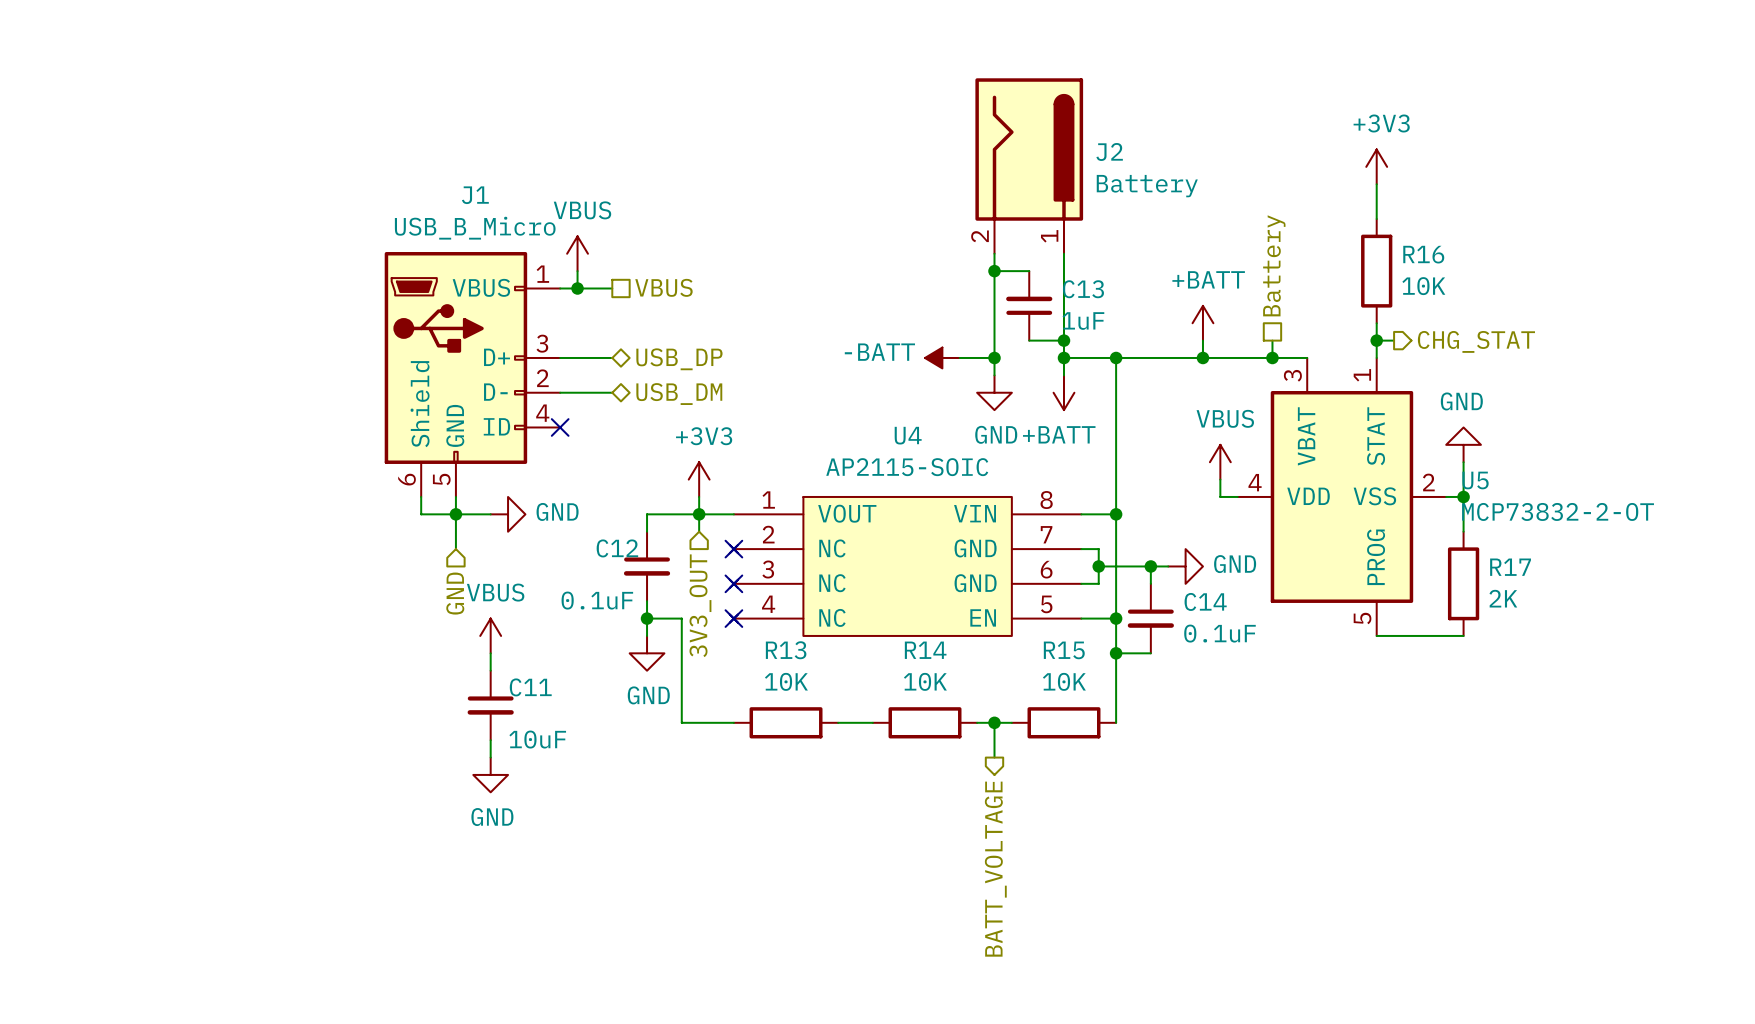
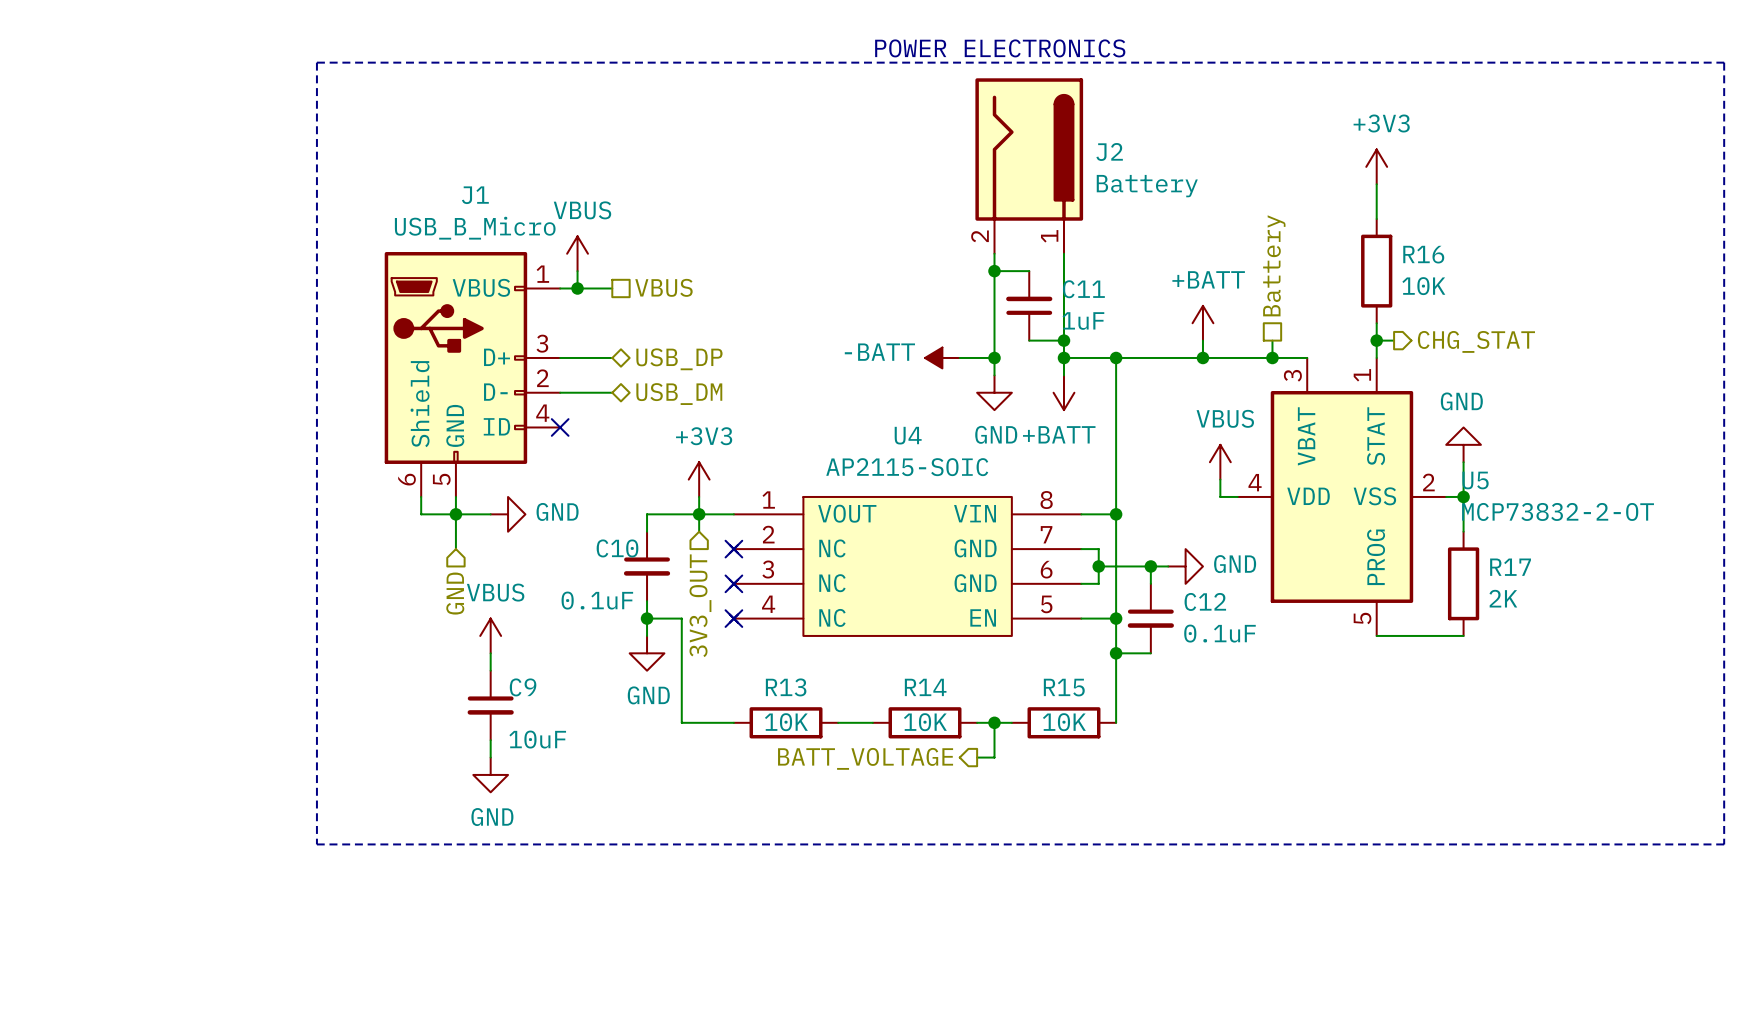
text: none -> POWER ELECTRONICS (1000, 48)
line: none -> (316, 62) (1724, 62) (1724, 844) (316, 844) (316, 62)
C13 name: C13 (1083, 289) -> C11 (1083, 289)
C12 name: C12 (617, 548) -> C10 (617, 548)
C14 name: C14 (1205, 601) -> C12 (1205, 601)
R13 name position: R13 (786, 650) -> R13 (786, 687)
R14 name position: R14 (925, 650) -> R14 (925, 687)
R15 name position: R15 (1064, 650) -> R15 (1064, 687)
R13 value position: 10K (786, 681) -> 10K (786, 722)
R14 value position: 10K (925, 681) -> 10K (925, 722)
R15 value position: 10K (1064, 681) -> 10K (1064, 722)
C11 name: C11 (530, 687) -> C9 (523, 687)
hierarchical label rotation: 0° (995, 869) -> 90° clockwise (865, 758)

